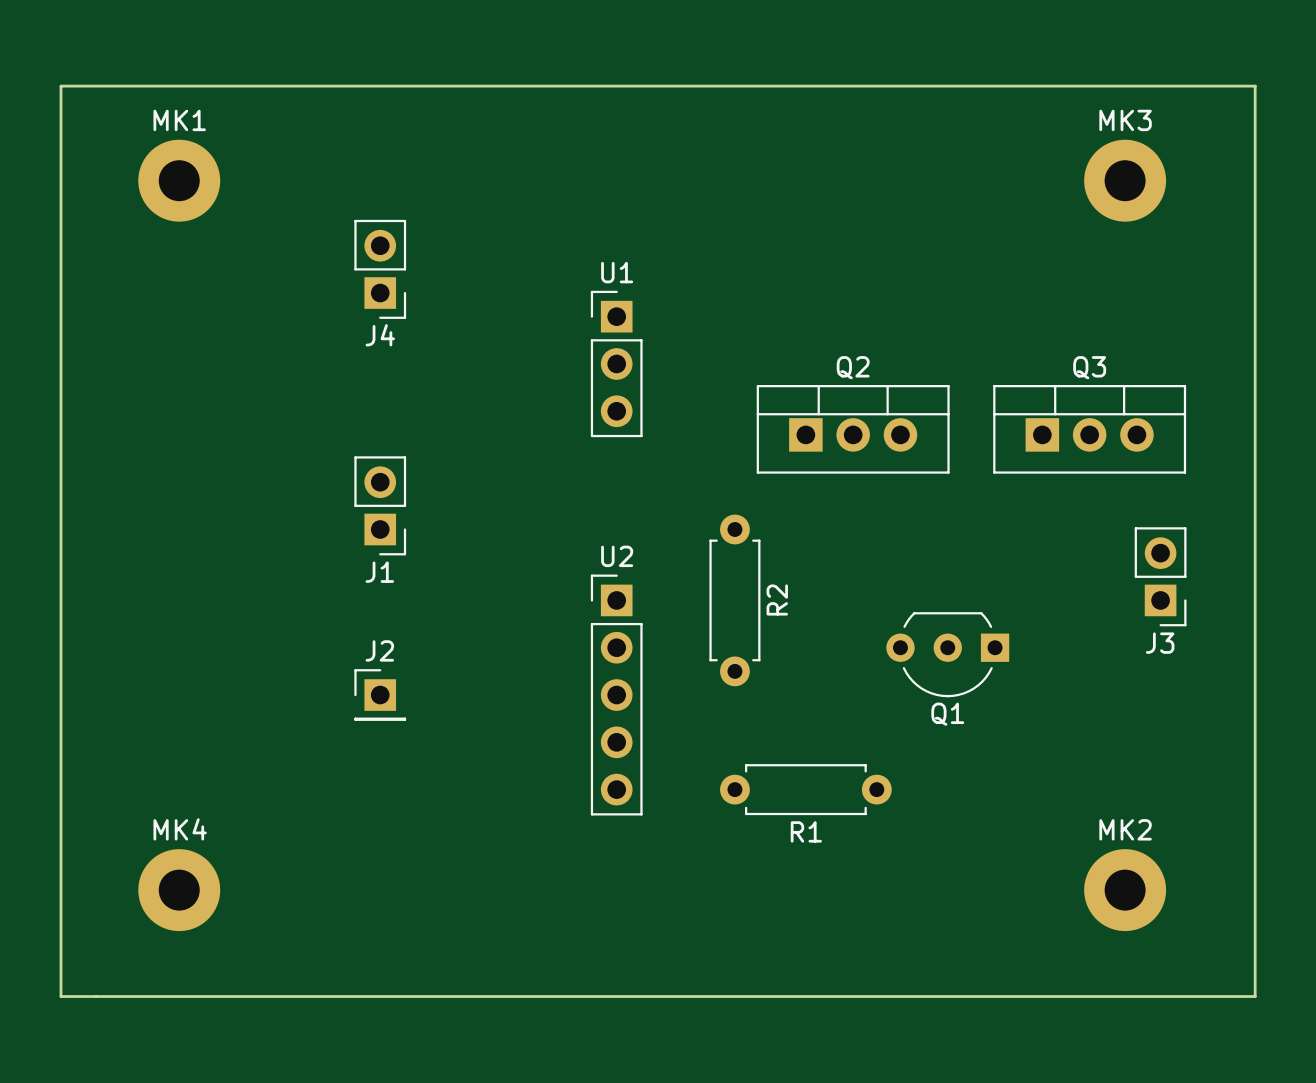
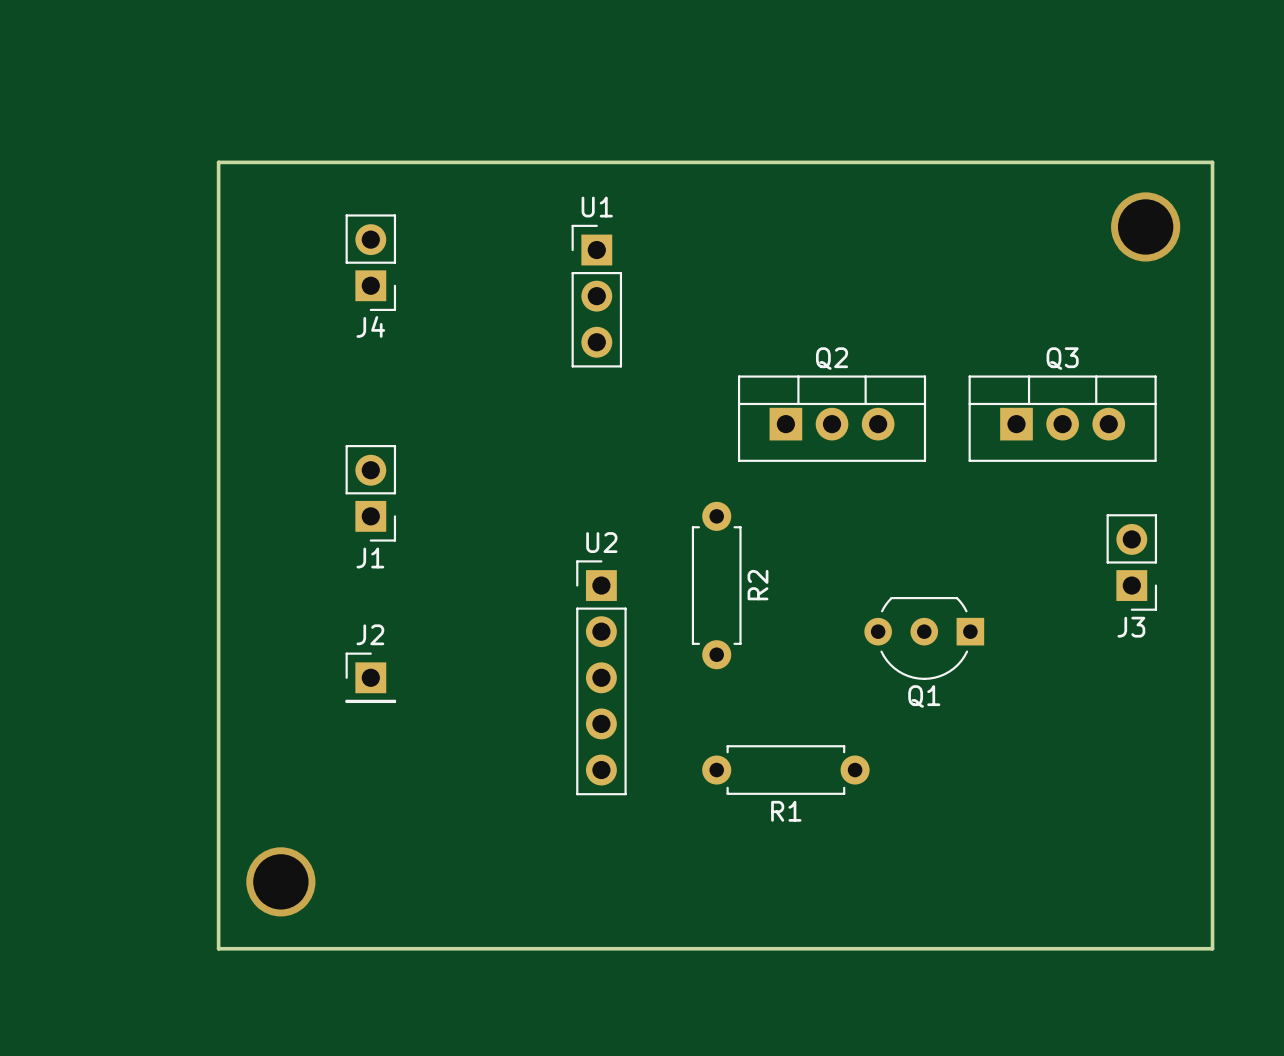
board edge: (61, 86) (61, 996) (1255, 996) (1255, 86) (61, 86) -> (218, 162) (218, 948) (1212, 948) (1212, 162) (218, 162)
MK1: (179, 180) -> none
MK3: (1125, 180) -> none
via: none -> (1145, 226)
U1 position: (616, 363) -> (596, 296)
MK4: (179, 890) -> none
MK2: (1125, 890) -> none
via: none -> (280, 881)

